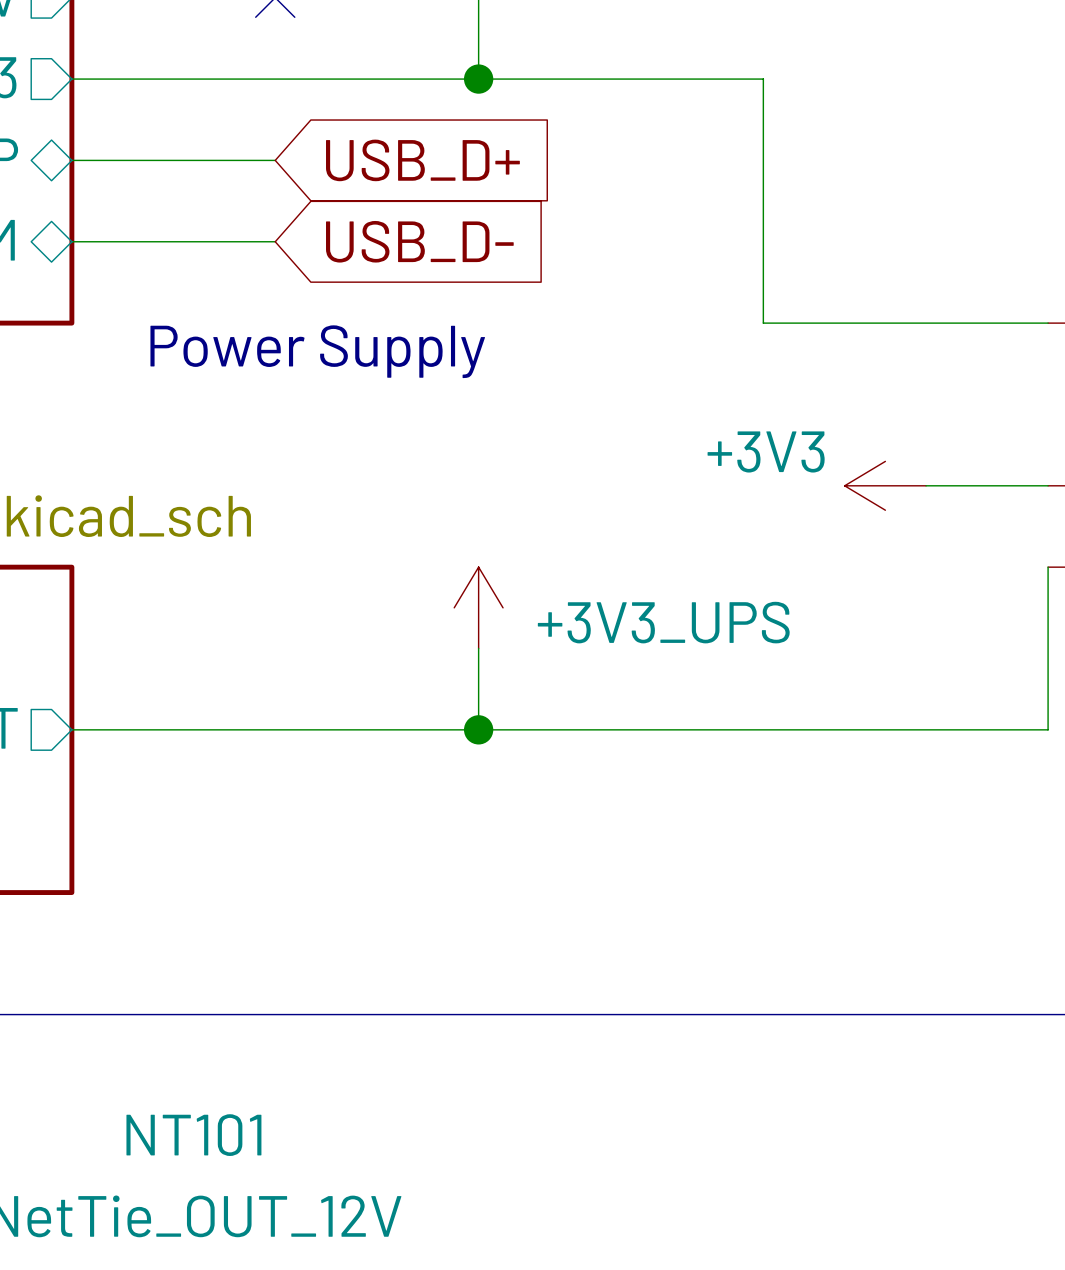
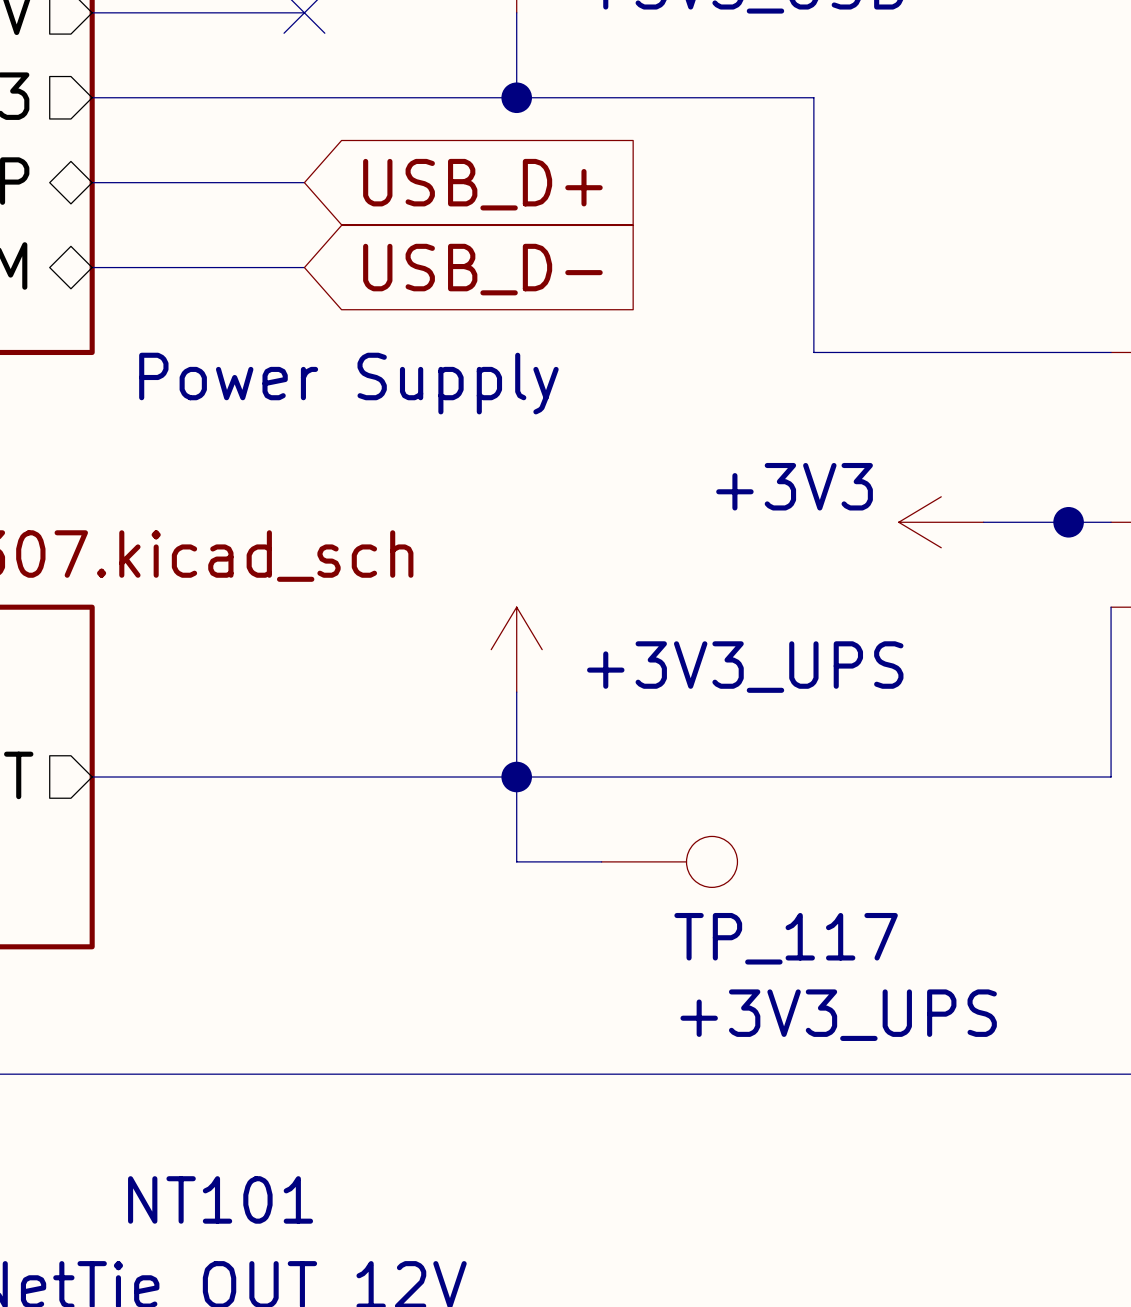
junction: none -> (1068, 522)
wire: none -> (516, 777) (516, 861) (601, 861)
TP_117: none -> +3V3_UPS (669, 861)

